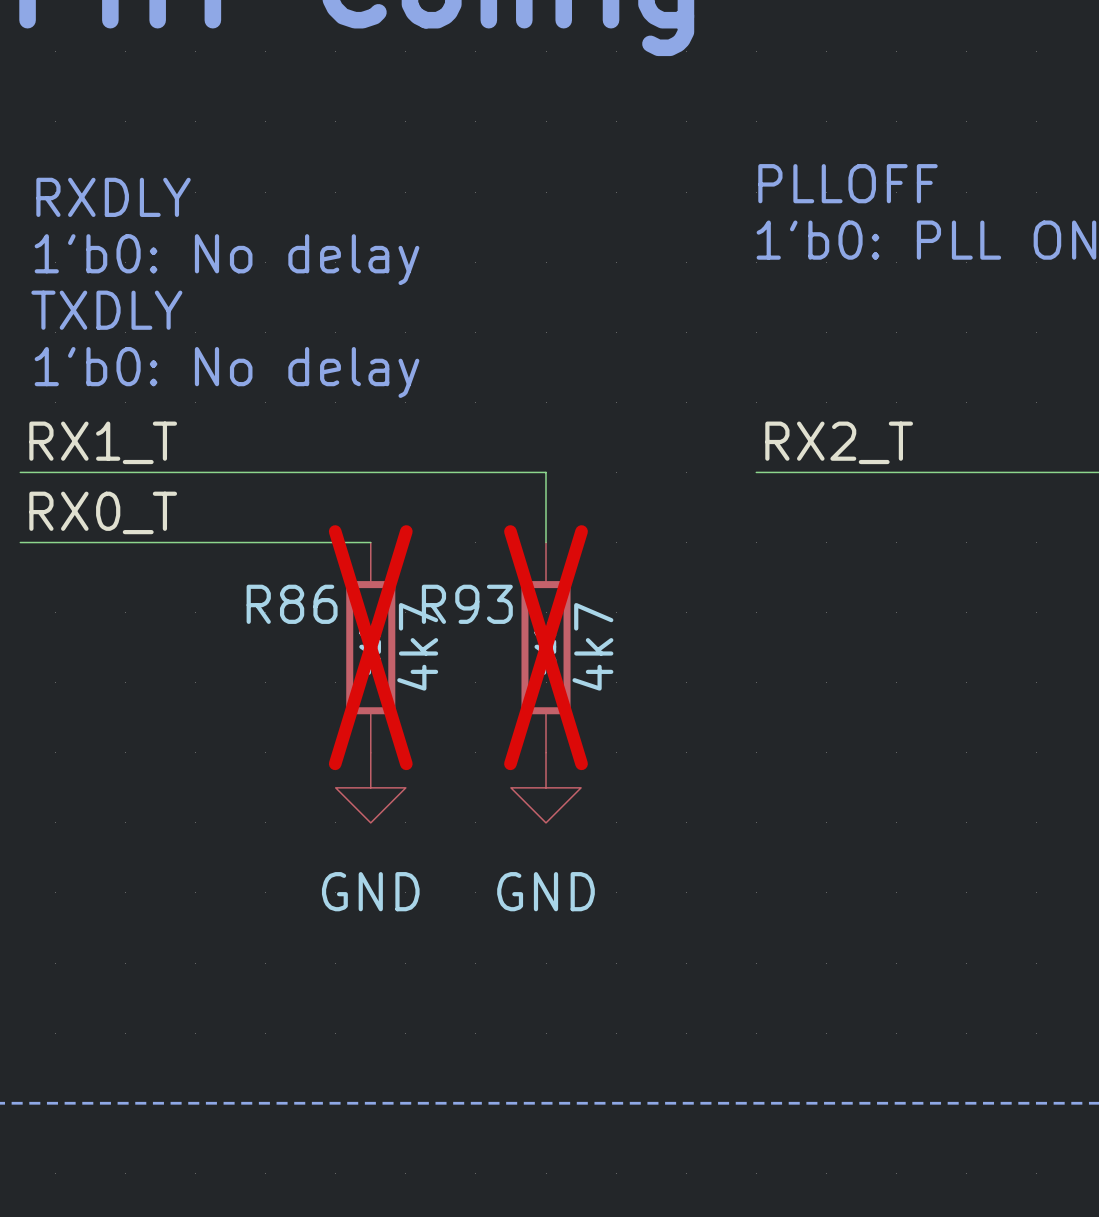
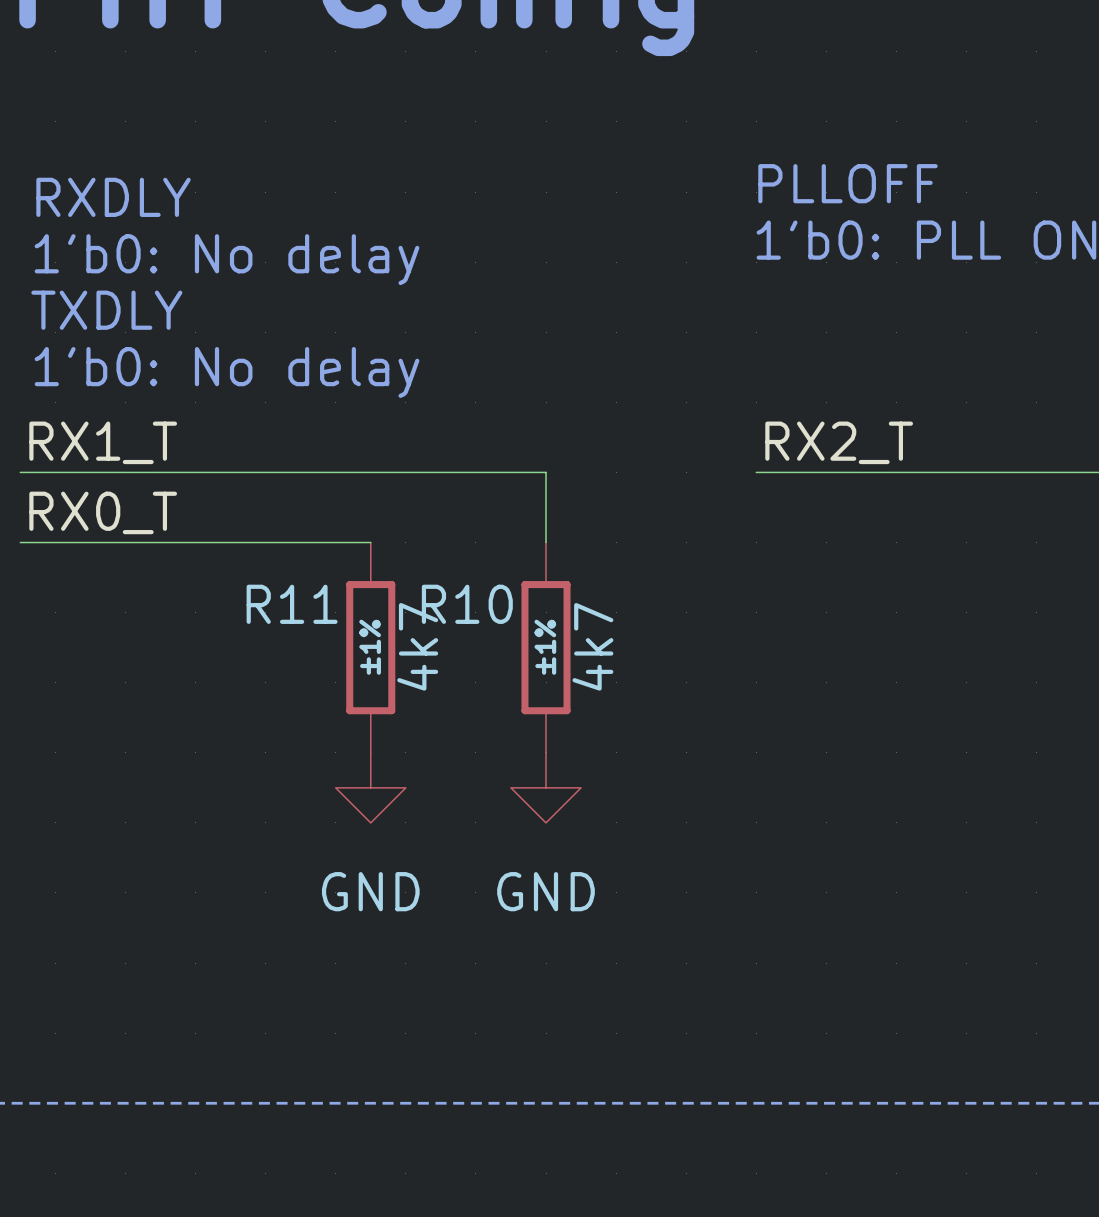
R86 name: R86 (292, 604) -> R11 (292, 604)
R93 name: R93 (467, 604) -> R10 (467, 604)
R86 do-not-place cross: (370, 647) -> none
R93 do-not-place cross: (546, 647) -> none

